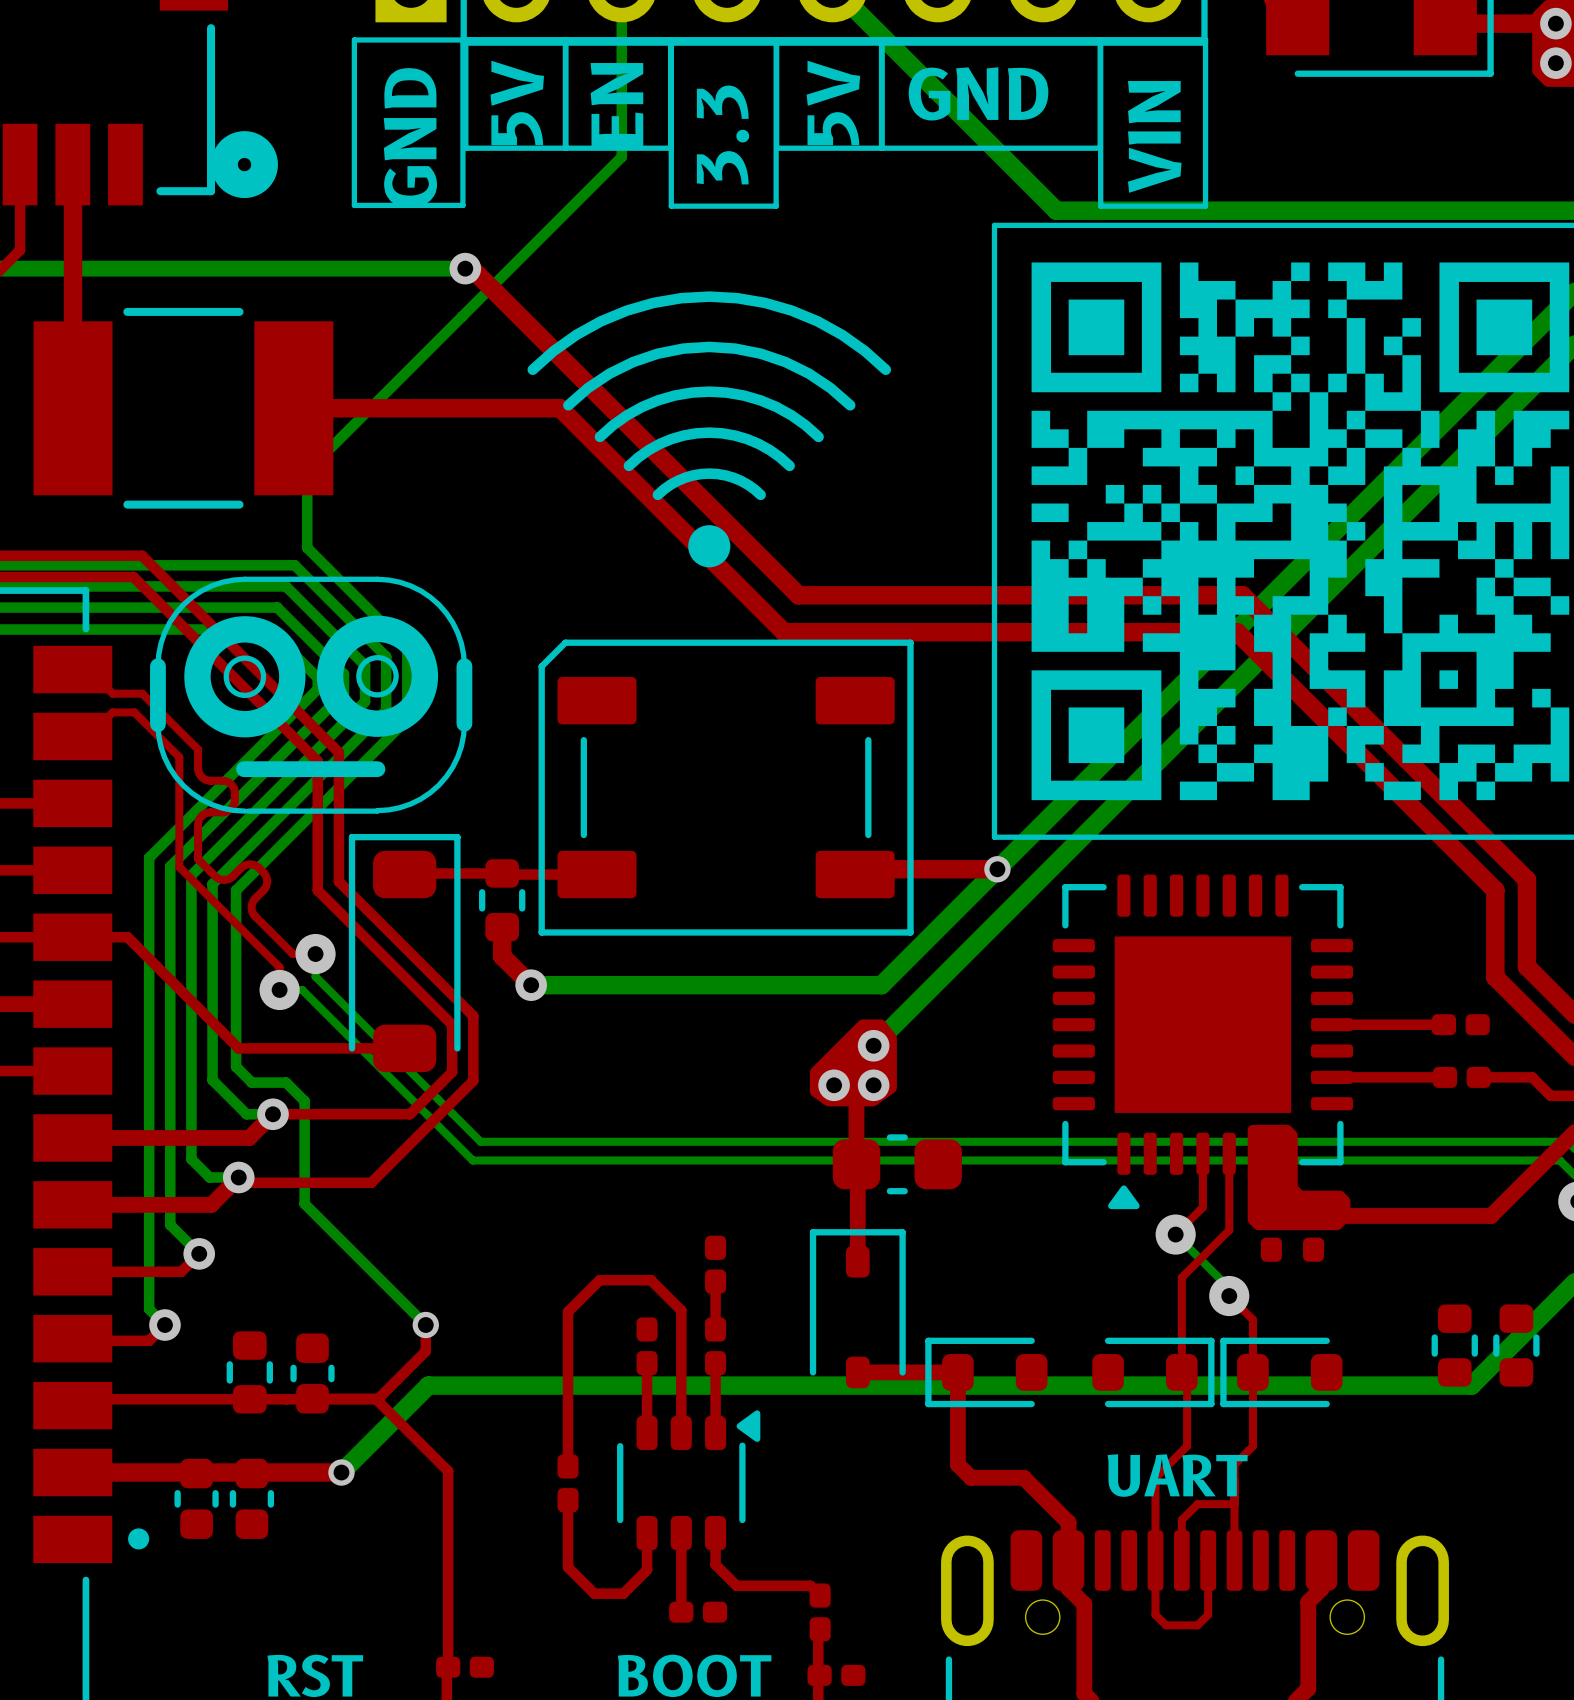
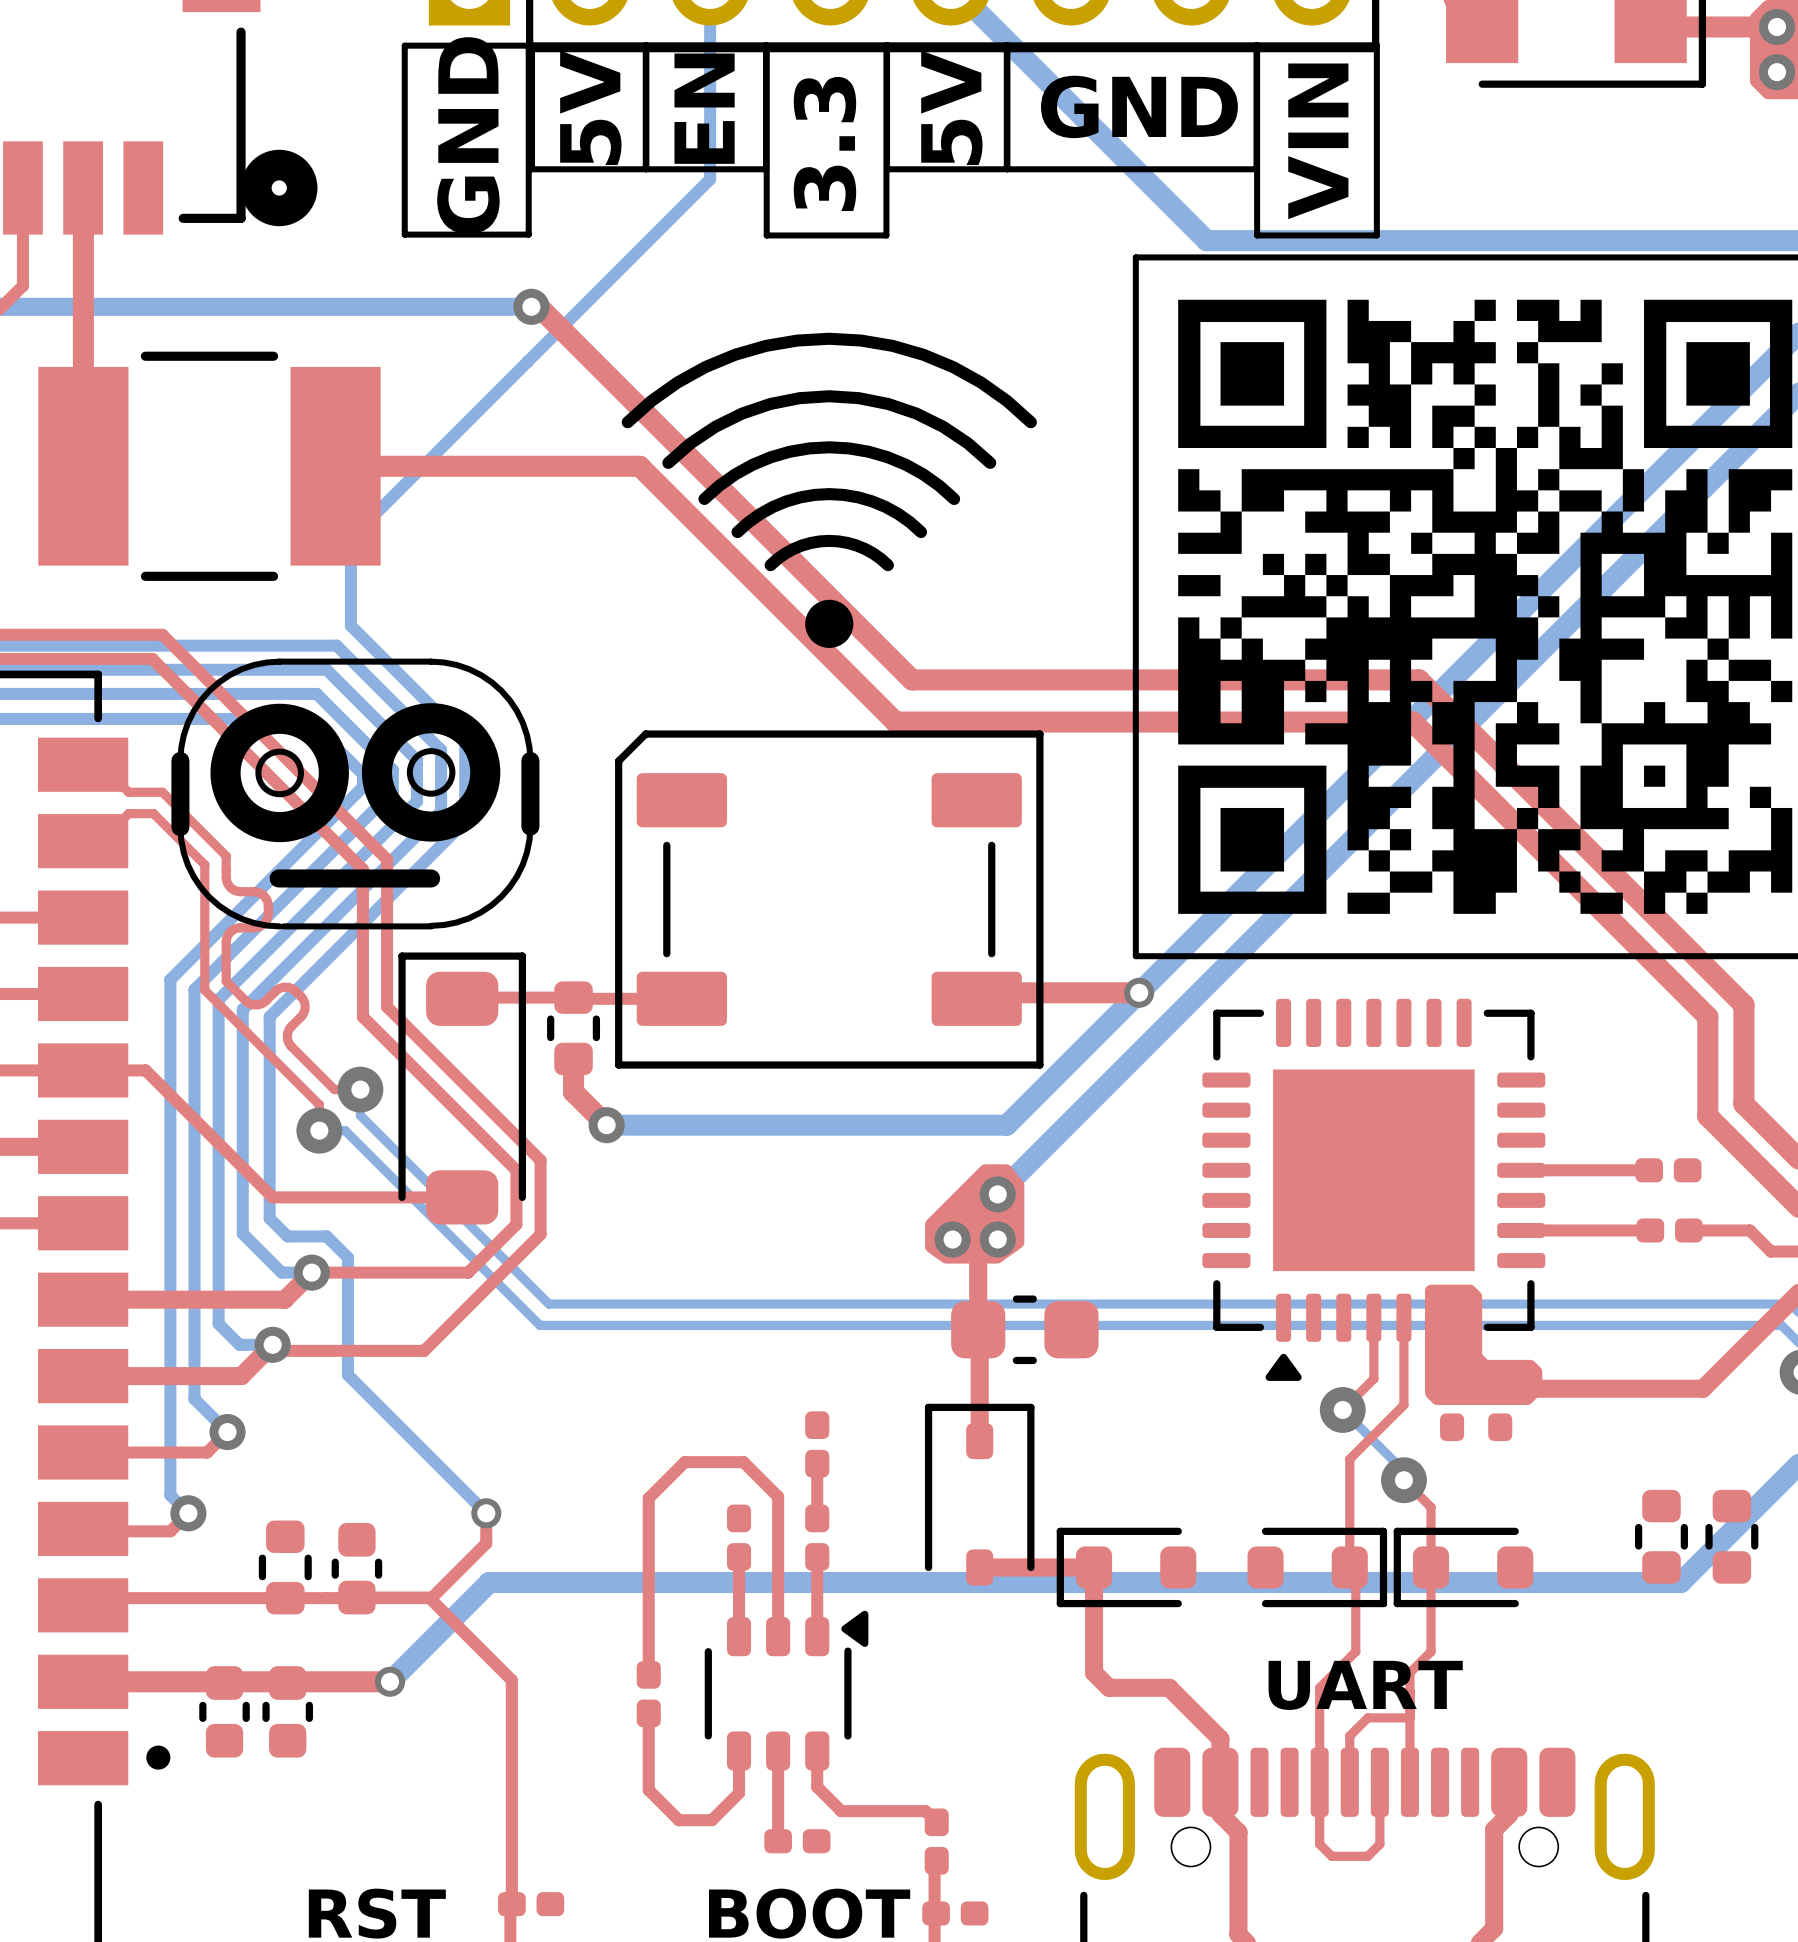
line: (532, 369) (553, 351) (576, 334) (600, 321) (626, 310) (653, 302) (681, 298) (709, 296) (737, 298) (764, 302) (791, 310) (817, 321) (842, 334) (864, 351) (885, 369) -> (627, 422) (651, 400) (677, 382) (705, 367) (735, 354) (765, 345) (797, 340) (829, 338) (861, 340) (892, 345) (923, 354) (952, 367) (980, 382) (1007, 400) (1030, 422)
line: (568, 405) (587, 388) (609, 373) (633, 362) (657, 353) (683, 348) (709, 346) (735, 348) (760, 353) (785, 362) (808, 373) (830, 388) (850, 405) -> (668, 462) (690, 443) (715, 426) (742, 413) (770, 403) (799, 398) (829, 396) (858, 398) (888, 403) (916, 413) (943, 426) (967, 443) (990, 462)
line: (599, 436) (627, 415) (642, 406) (674, 395) (709, 391) (743, 395) (776, 406) (805, 425) (818, 436) -> (704, 499) (735, 474) (752, 464) (789, 451) (829, 447) (868, 451) (905, 464) (939, 485) (954, 499)
line: (628, 465) (659, 443) (683, 435) (709, 432) (746, 438) (769, 450) (789, 465) -> (737, 532) (748, 522) (772, 506) (800, 497) (829, 494) (843, 494) (872, 501) (898, 513) (921, 532)
line: (657, 494) (670, 484) (685, 477) (709, 473) (733, 477) (747, 484) (760, 494) -> (770, 565) (785, 553) (801, 545) (829, 540) (847, 542) (865, 549) (887, 565)
drawing position: (709, 546) -> (829, 623)

